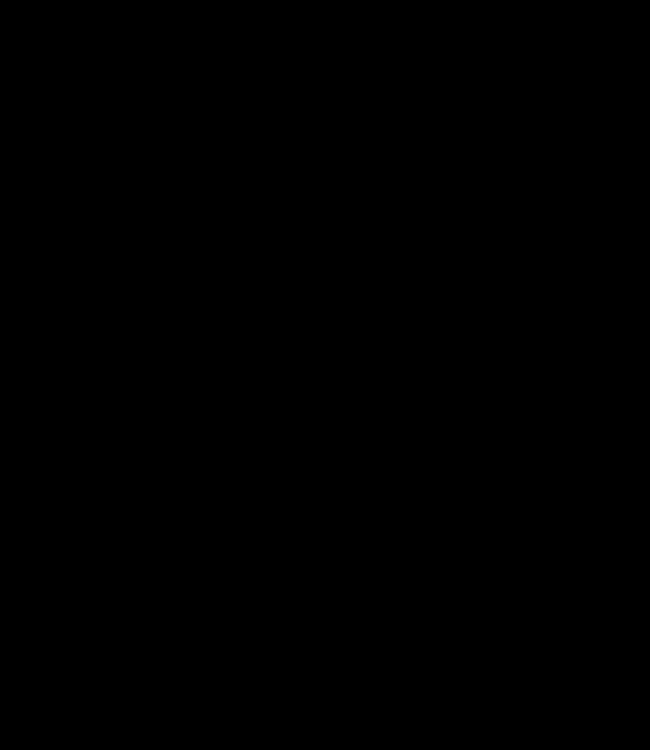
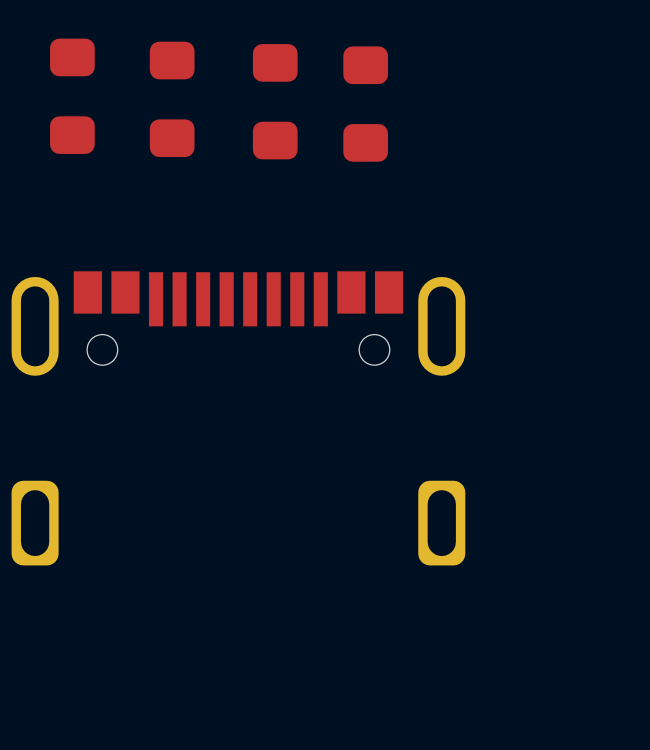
part: none -> (72, 96)
part: none -> (172, 99)
part: none -> (275, 101)
part: none -> (365, 104)
part: none -> (238, 418)

